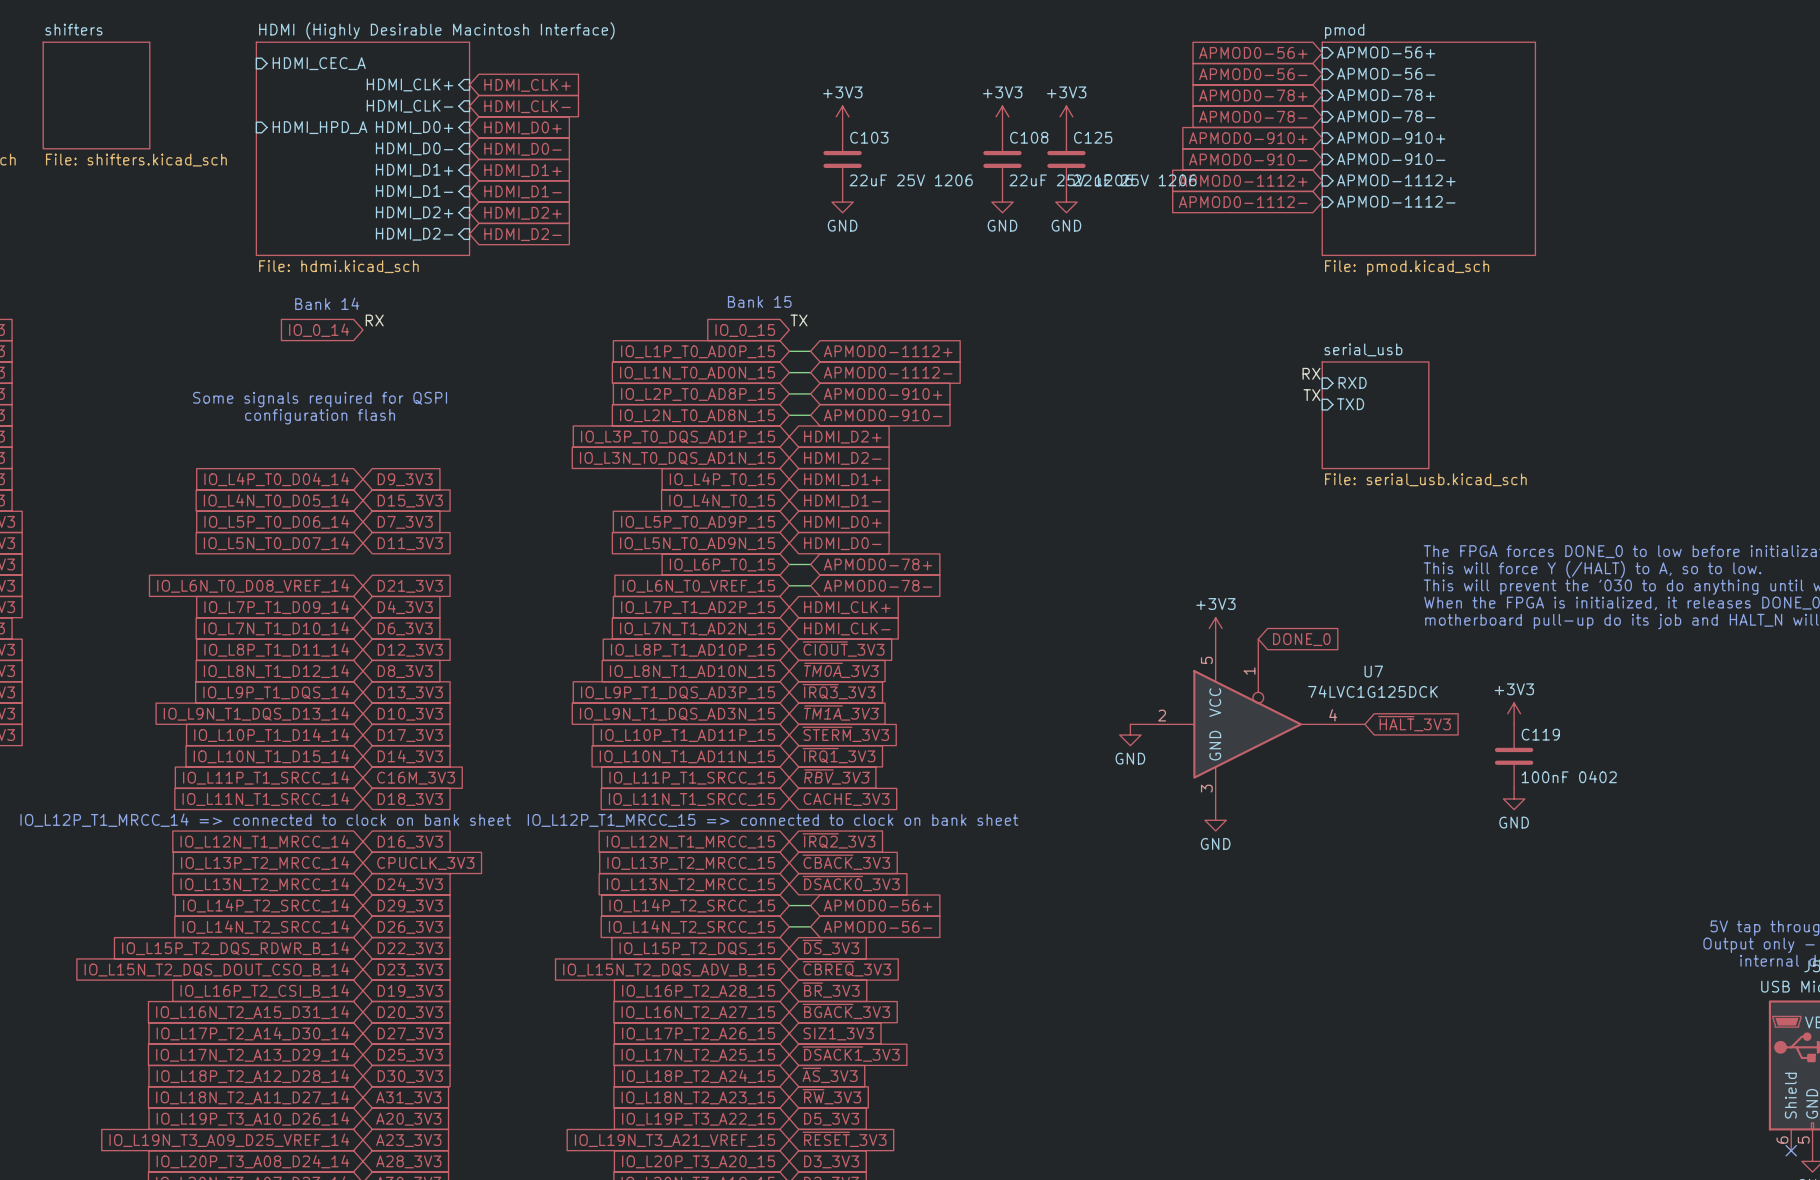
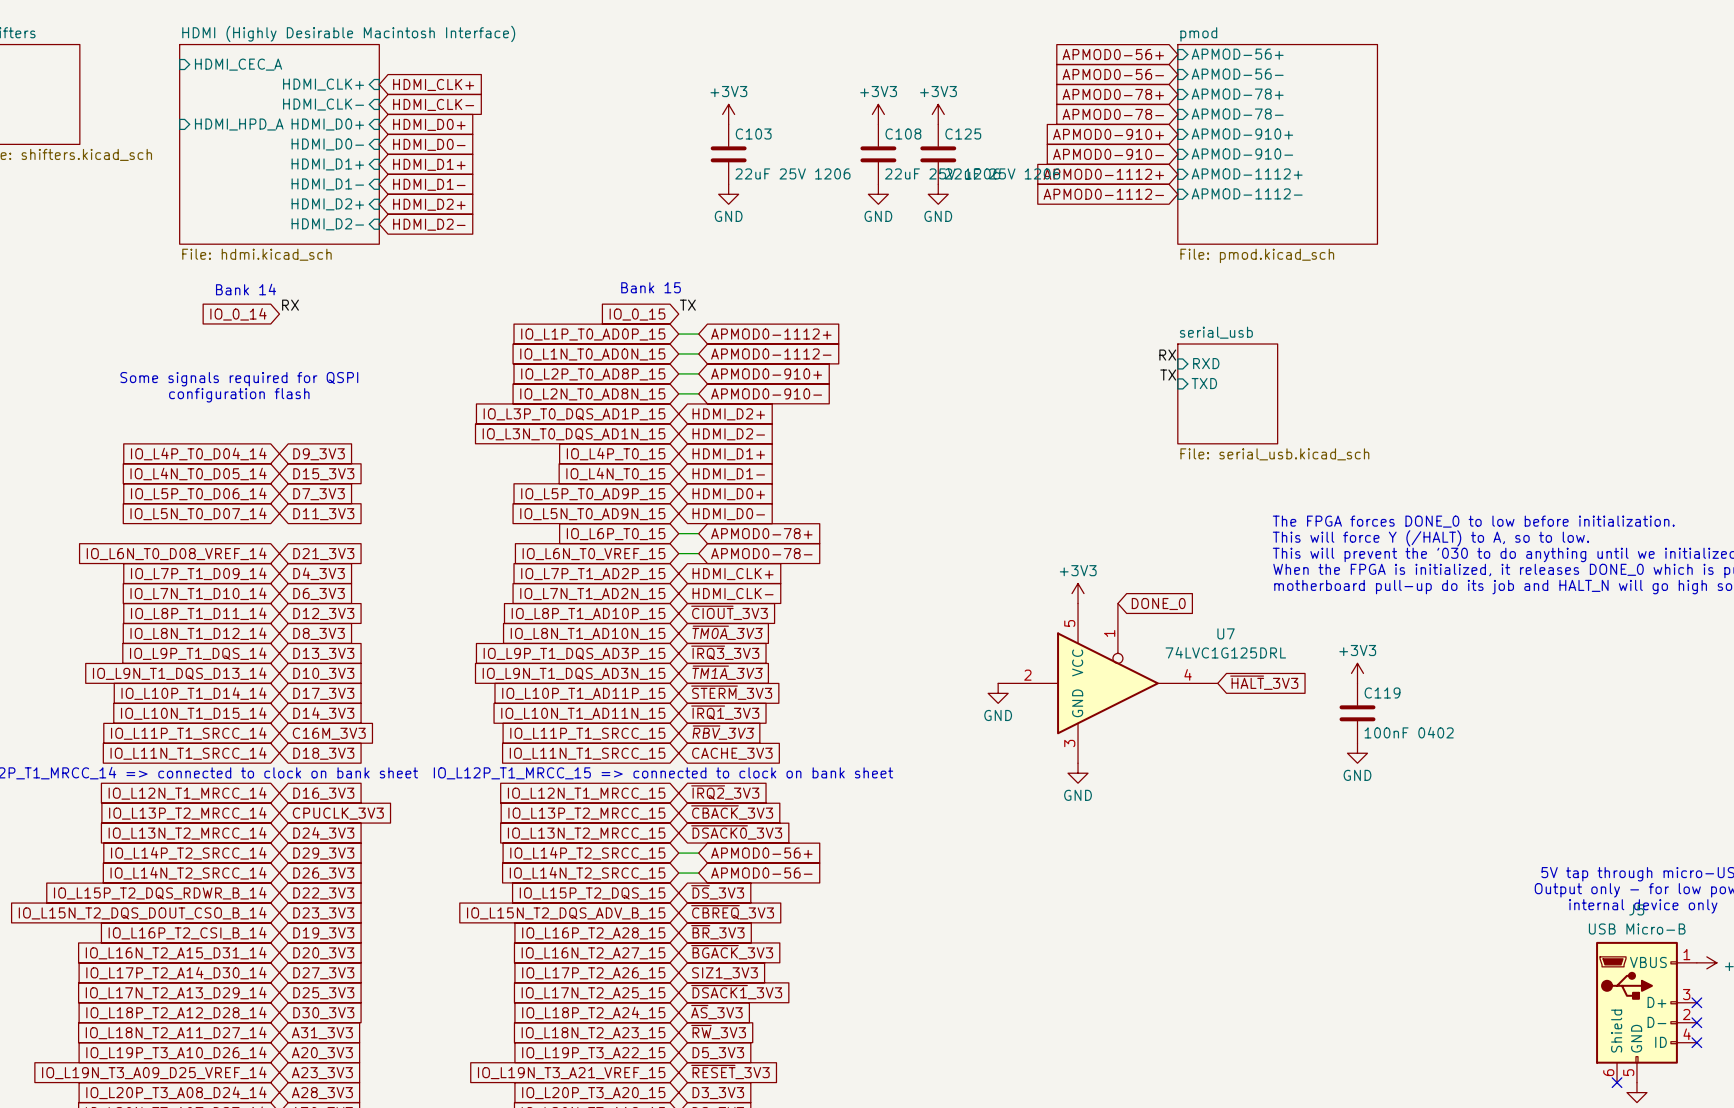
U7 value: 74LVC1G125DCK (1372, 691) -> 74LVC1G125DRL (1225, 652)

